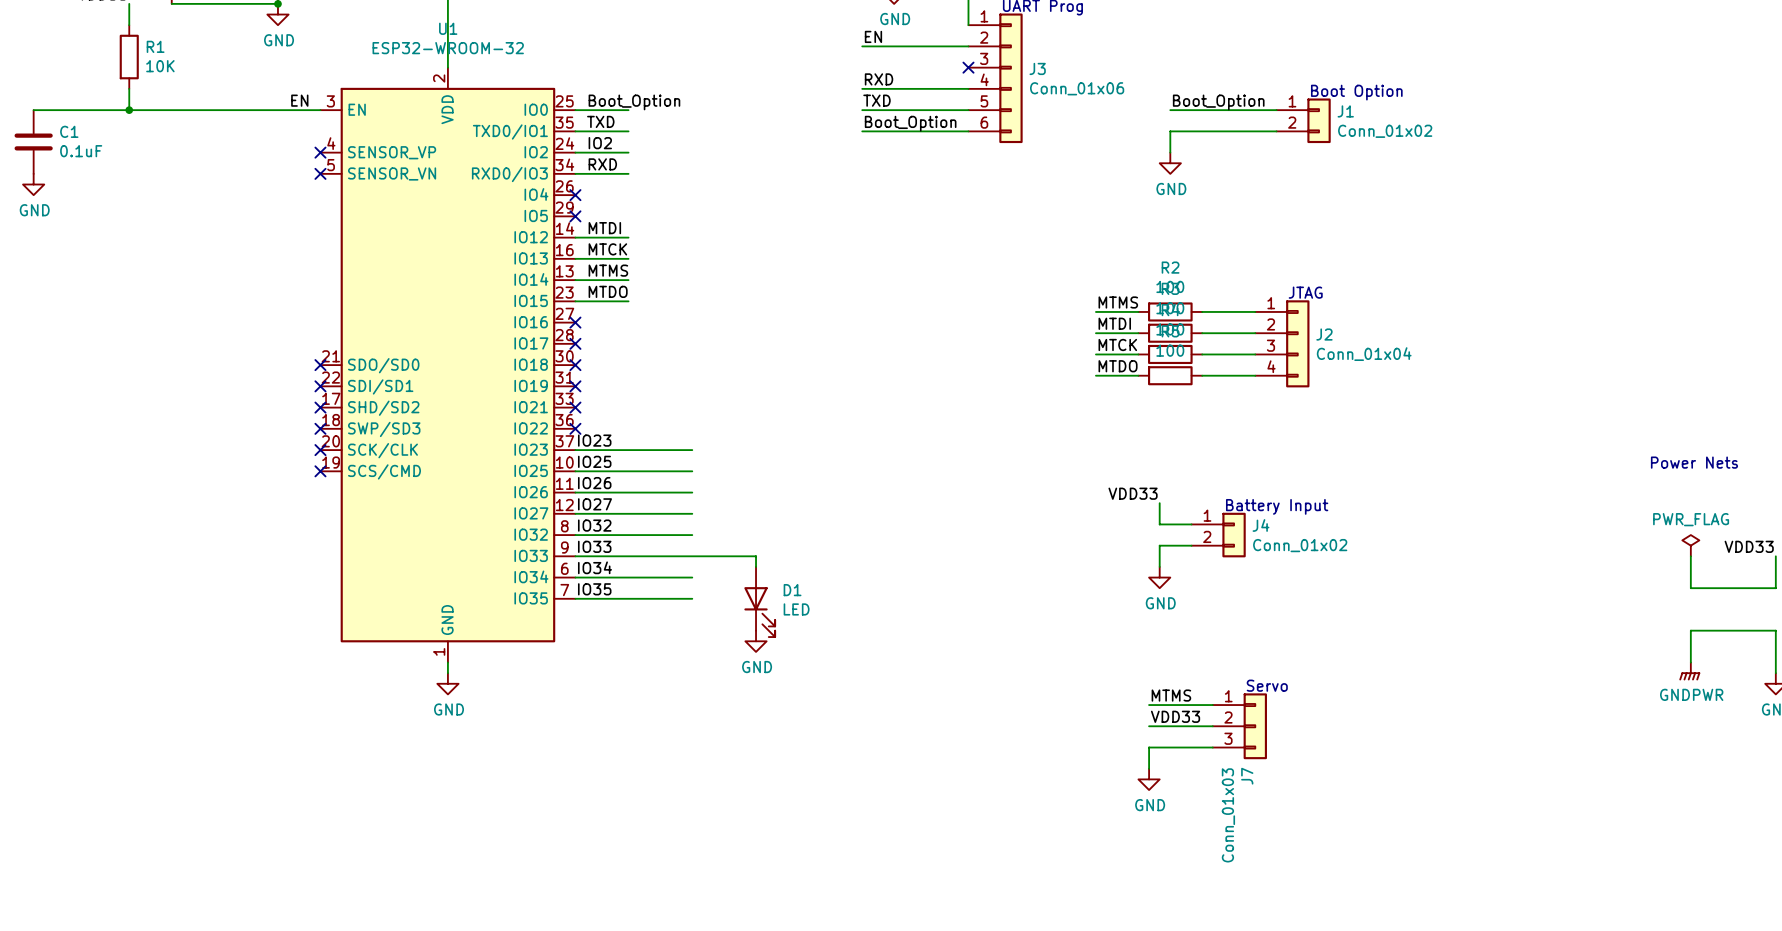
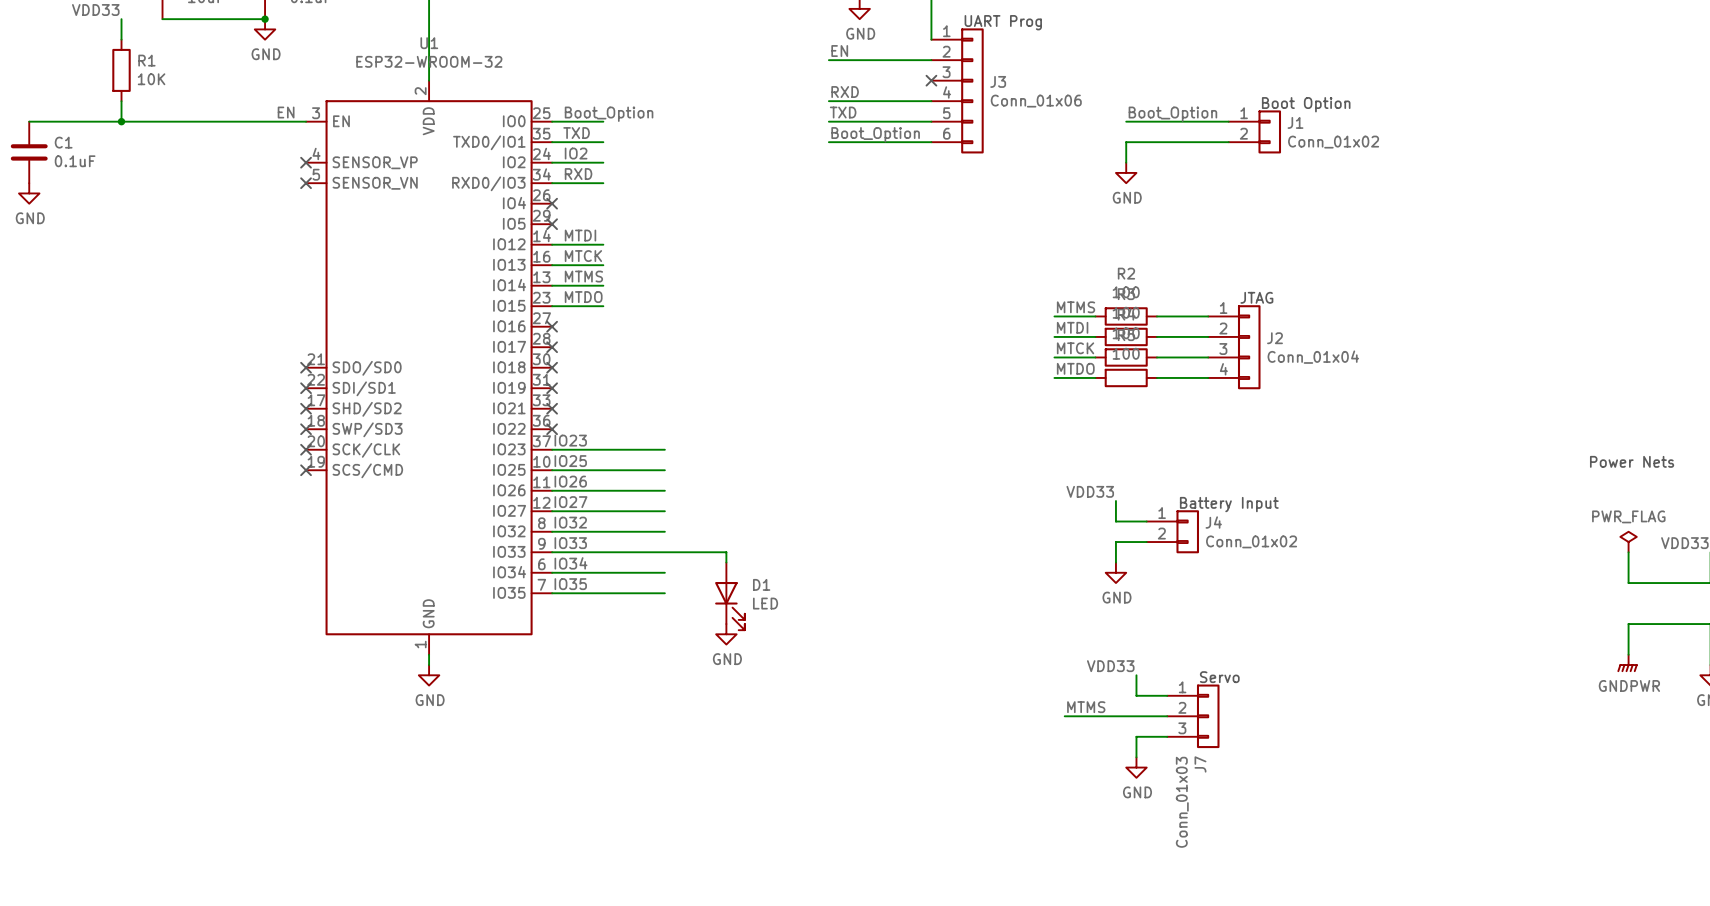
label position: MTMS (1171, 695) -> MTMS (1086, 707)
wire: (1149, 705) (1180, 705) -> (1136, 675) (1136, 695)
label position: VDD33 (1175, 716) -> VDD33 (1110, 666)
wire: none -> (1064, 716) (1105, 716)
wire: (1180, 747) (1149, 747) (1149, 768) -> (1136, 736) (1136, 757)
power symbol position: GND (1149, 779) -> GND (1136, 767)

